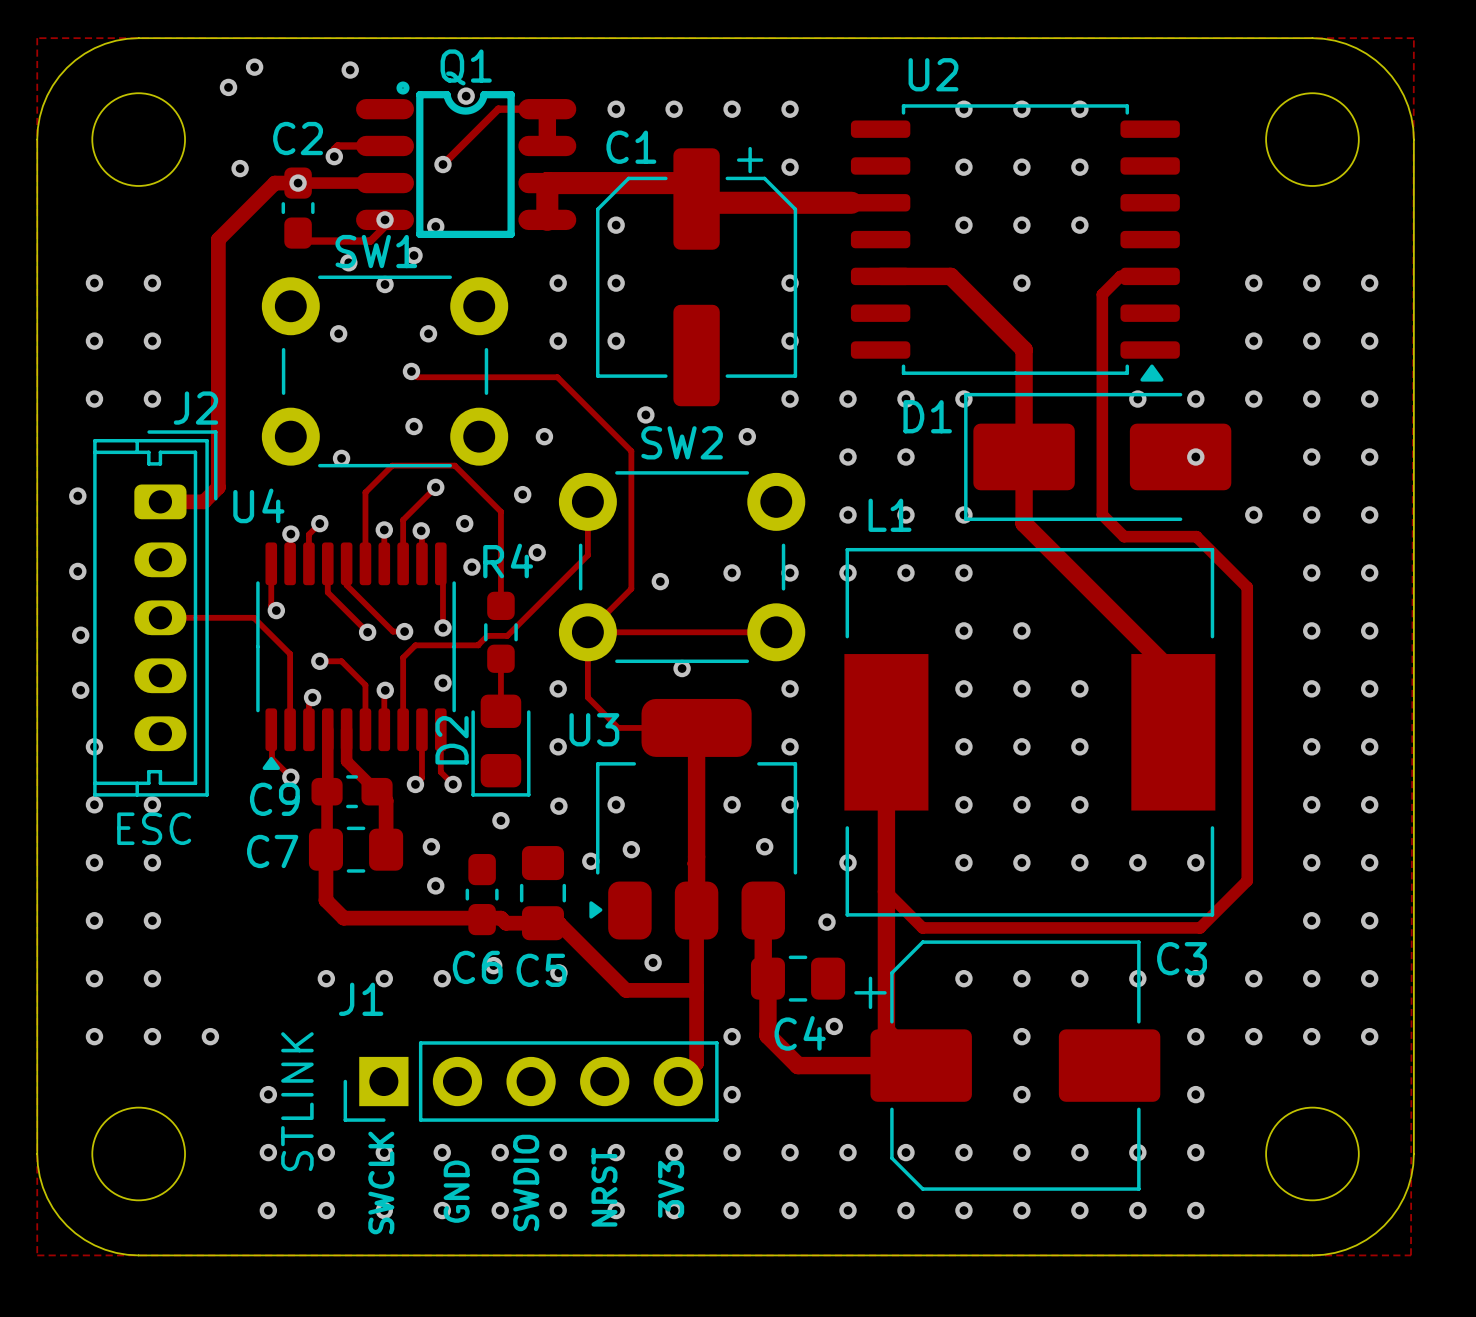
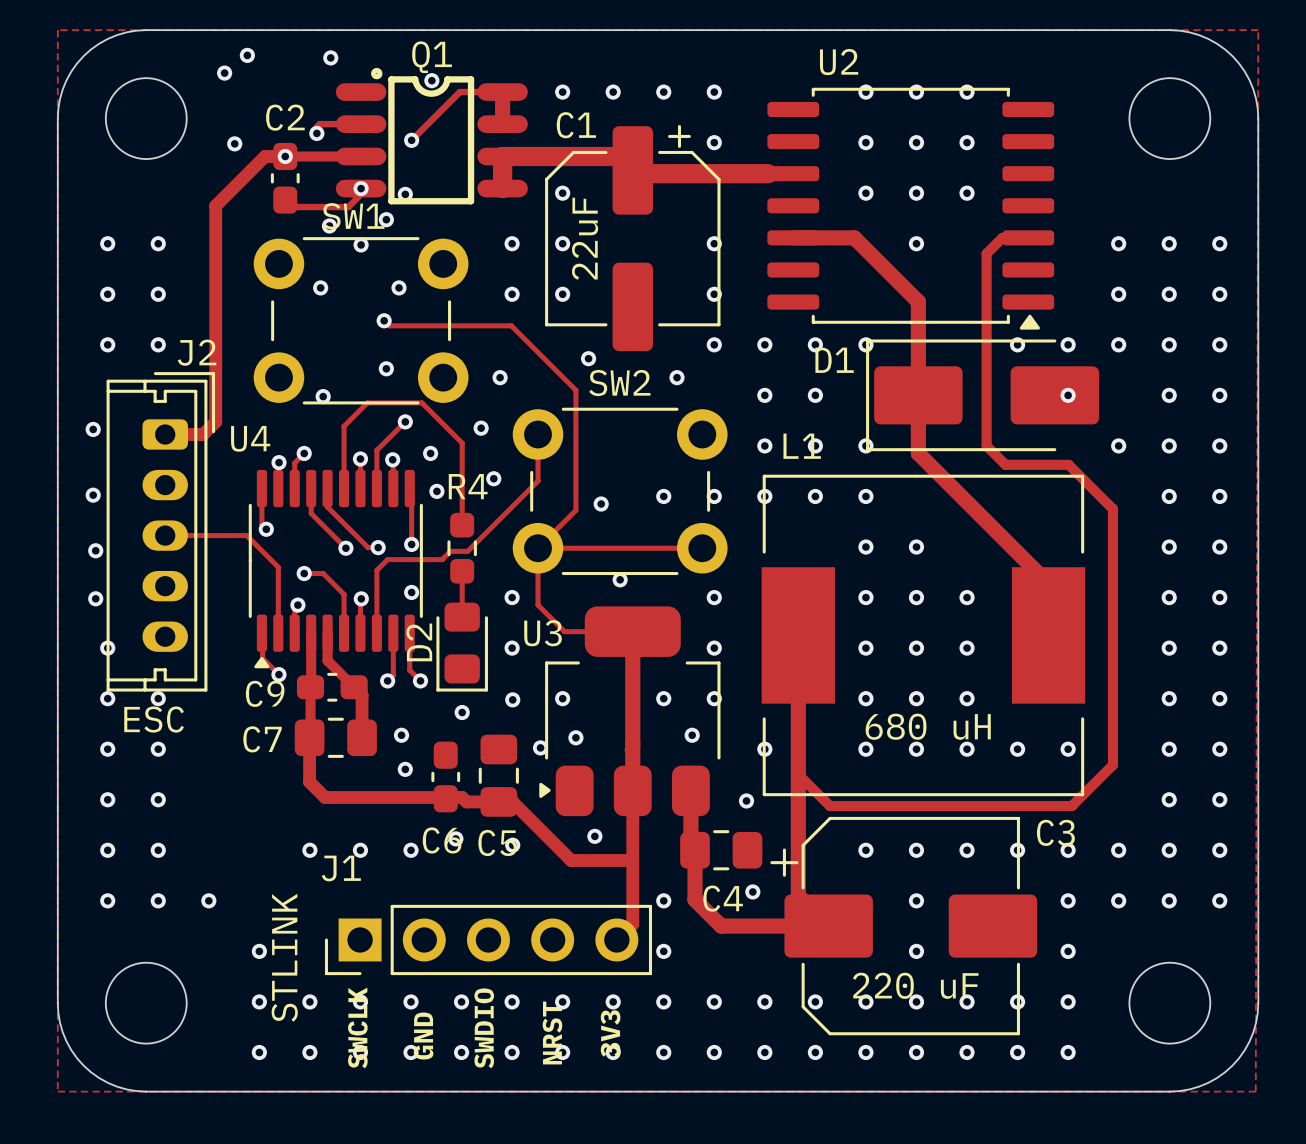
C1 value: none -> 22uF (585, 238)
L1 value: none -> 680 uH (928, 726)
C3 value: none -> 220 uF (915, 985)

